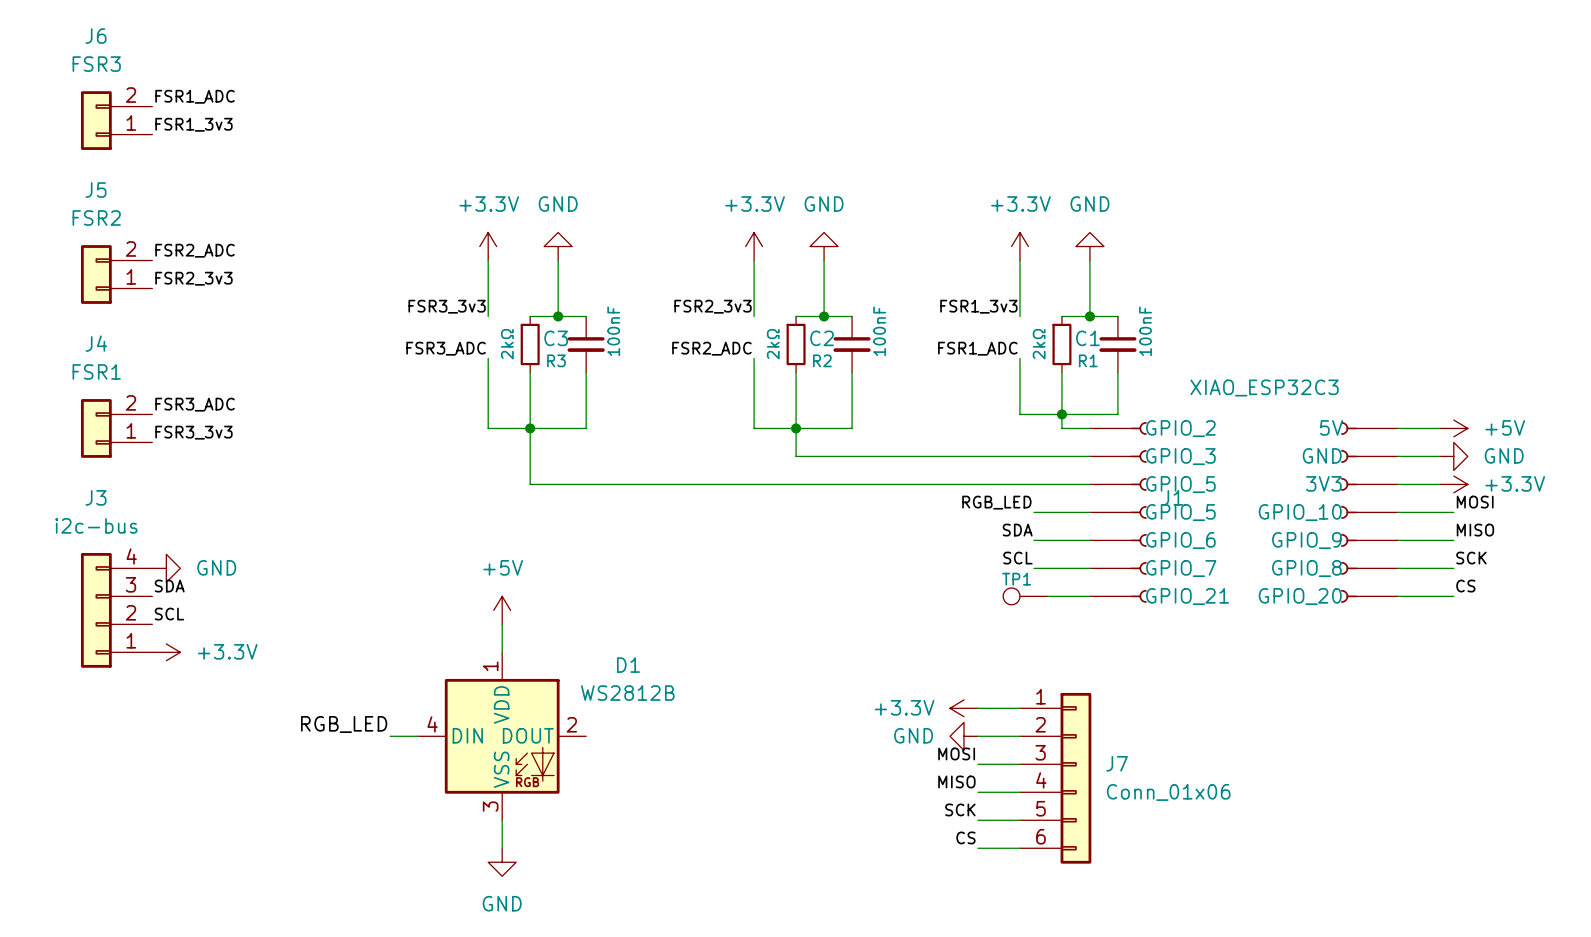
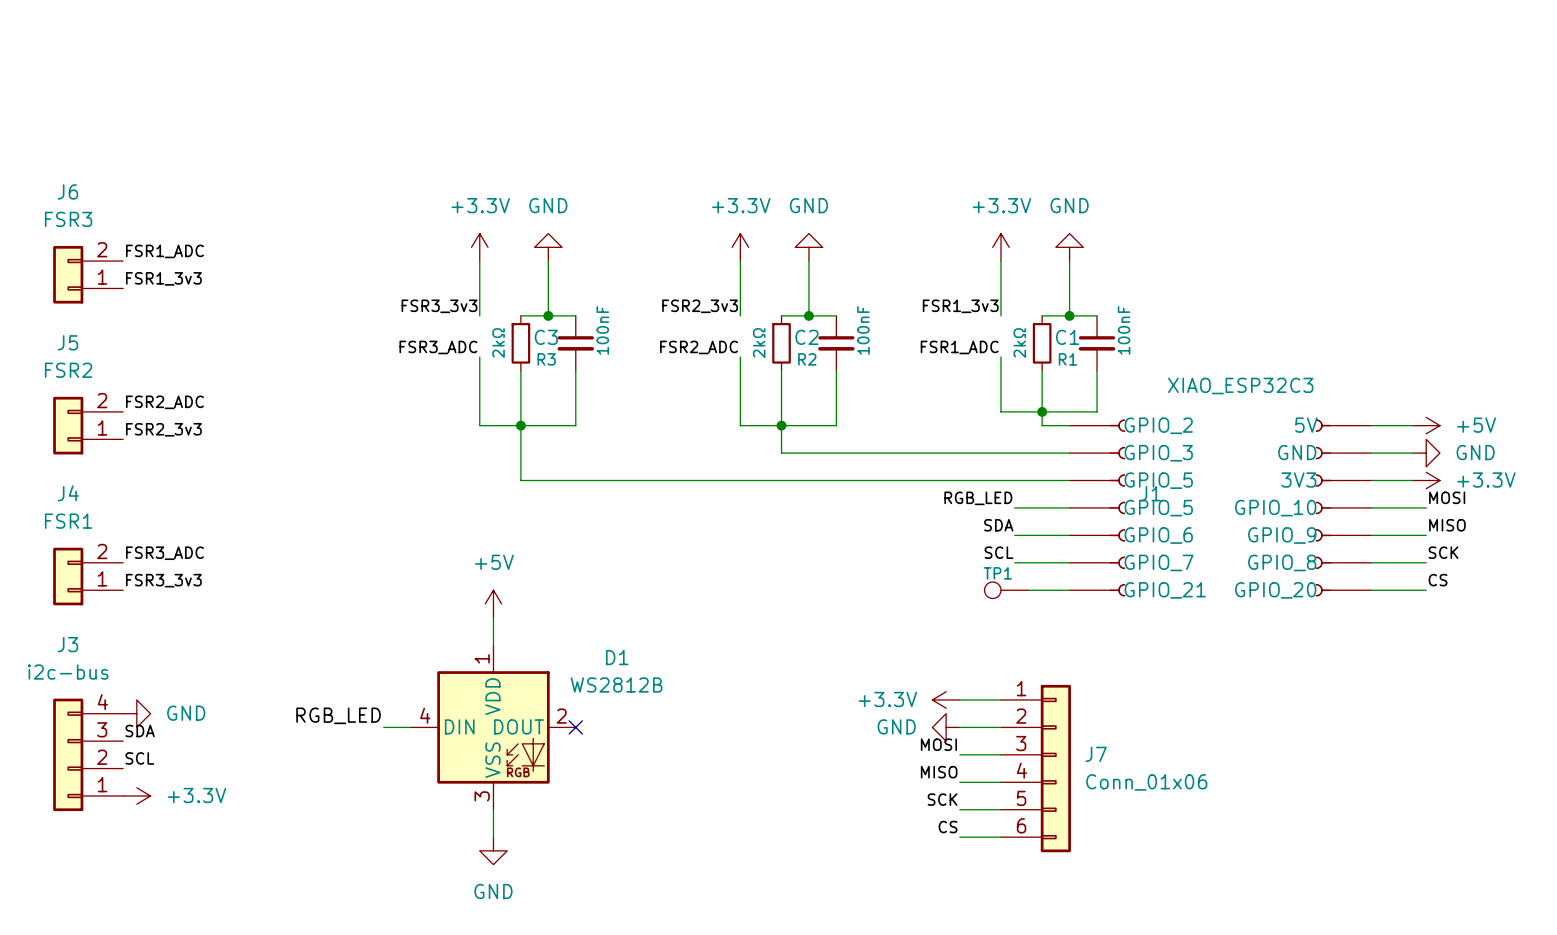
label position: FSR1_ADC (195, 96) -> FSR1_ADC (164, 251)
J6 position: (116, 120) -> (88, 274)
label position: FSR1_3v3 (193, 124) -> FSR1_3v3 (163, 278)
label position: FSR2_ADC (195, 250) -> FSR2_ADC (164, 402)
J5 position: (116, 274) -> (88, 425)
label position: FSR2_3v3 (193, 278) -> FSR2_3v3 (163, 429)
label position: FSR3_ADC (195, 404) -> FSR3_ADC (164, 553)
J4 position: (116, 428) -> (88, 576)
label position: FSR3_3v3 (193, 432) -> FSR3_3v3 (163, 580)
power symbol position: GND (166, 568) -> GND (136, 713)
label position: SDA (169, 586) -> SDA (140, 731)
J3 position: (116, 610) -> (88, 754)
label position: SCL (169, 614) -> SCL (139, 758)
power symbol position: +3.3V (166, 652) -> +3.3V (136, 796)
no-connect mark: none -> (575, 727)

